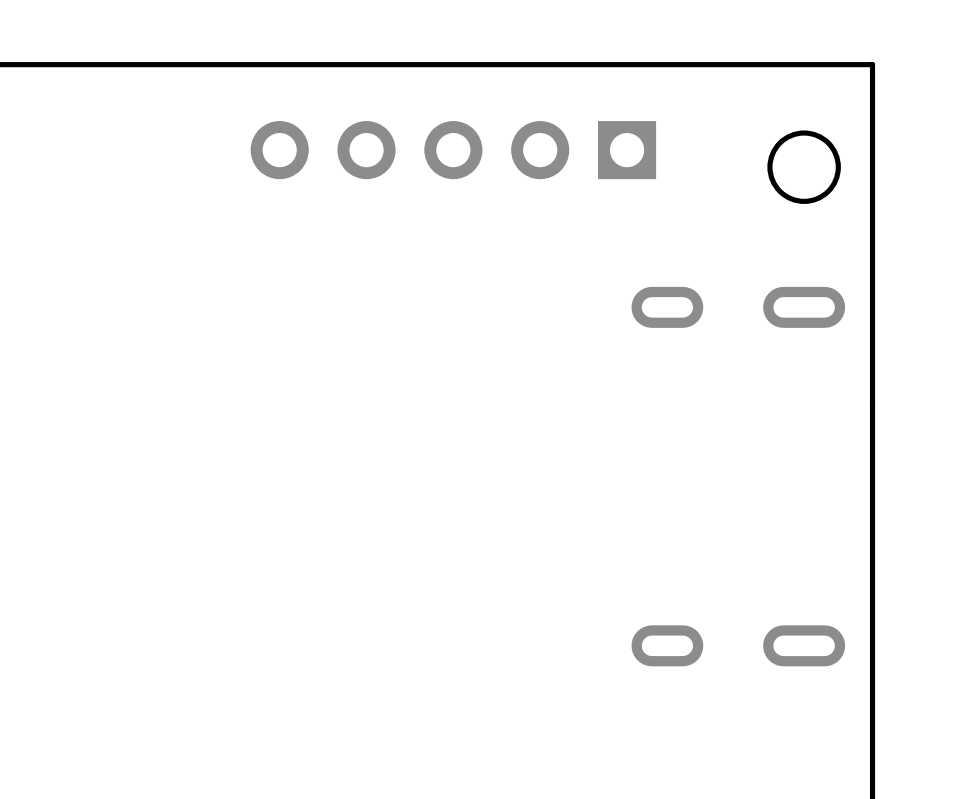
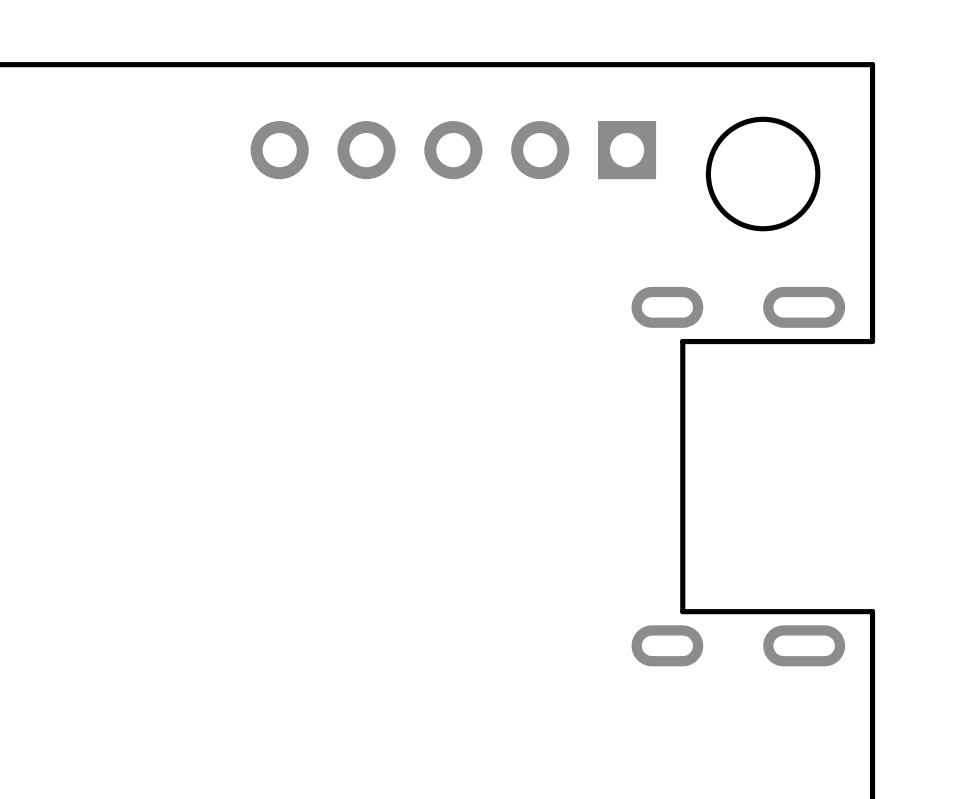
round board edge: none -> [705, 116, 821, 232]
round board edge: [767, 130, 841, 204] -> none
board edge: (872, 341) (872, 611) -> (872, 341) (682, 341) (682, 611) (872, 611)

